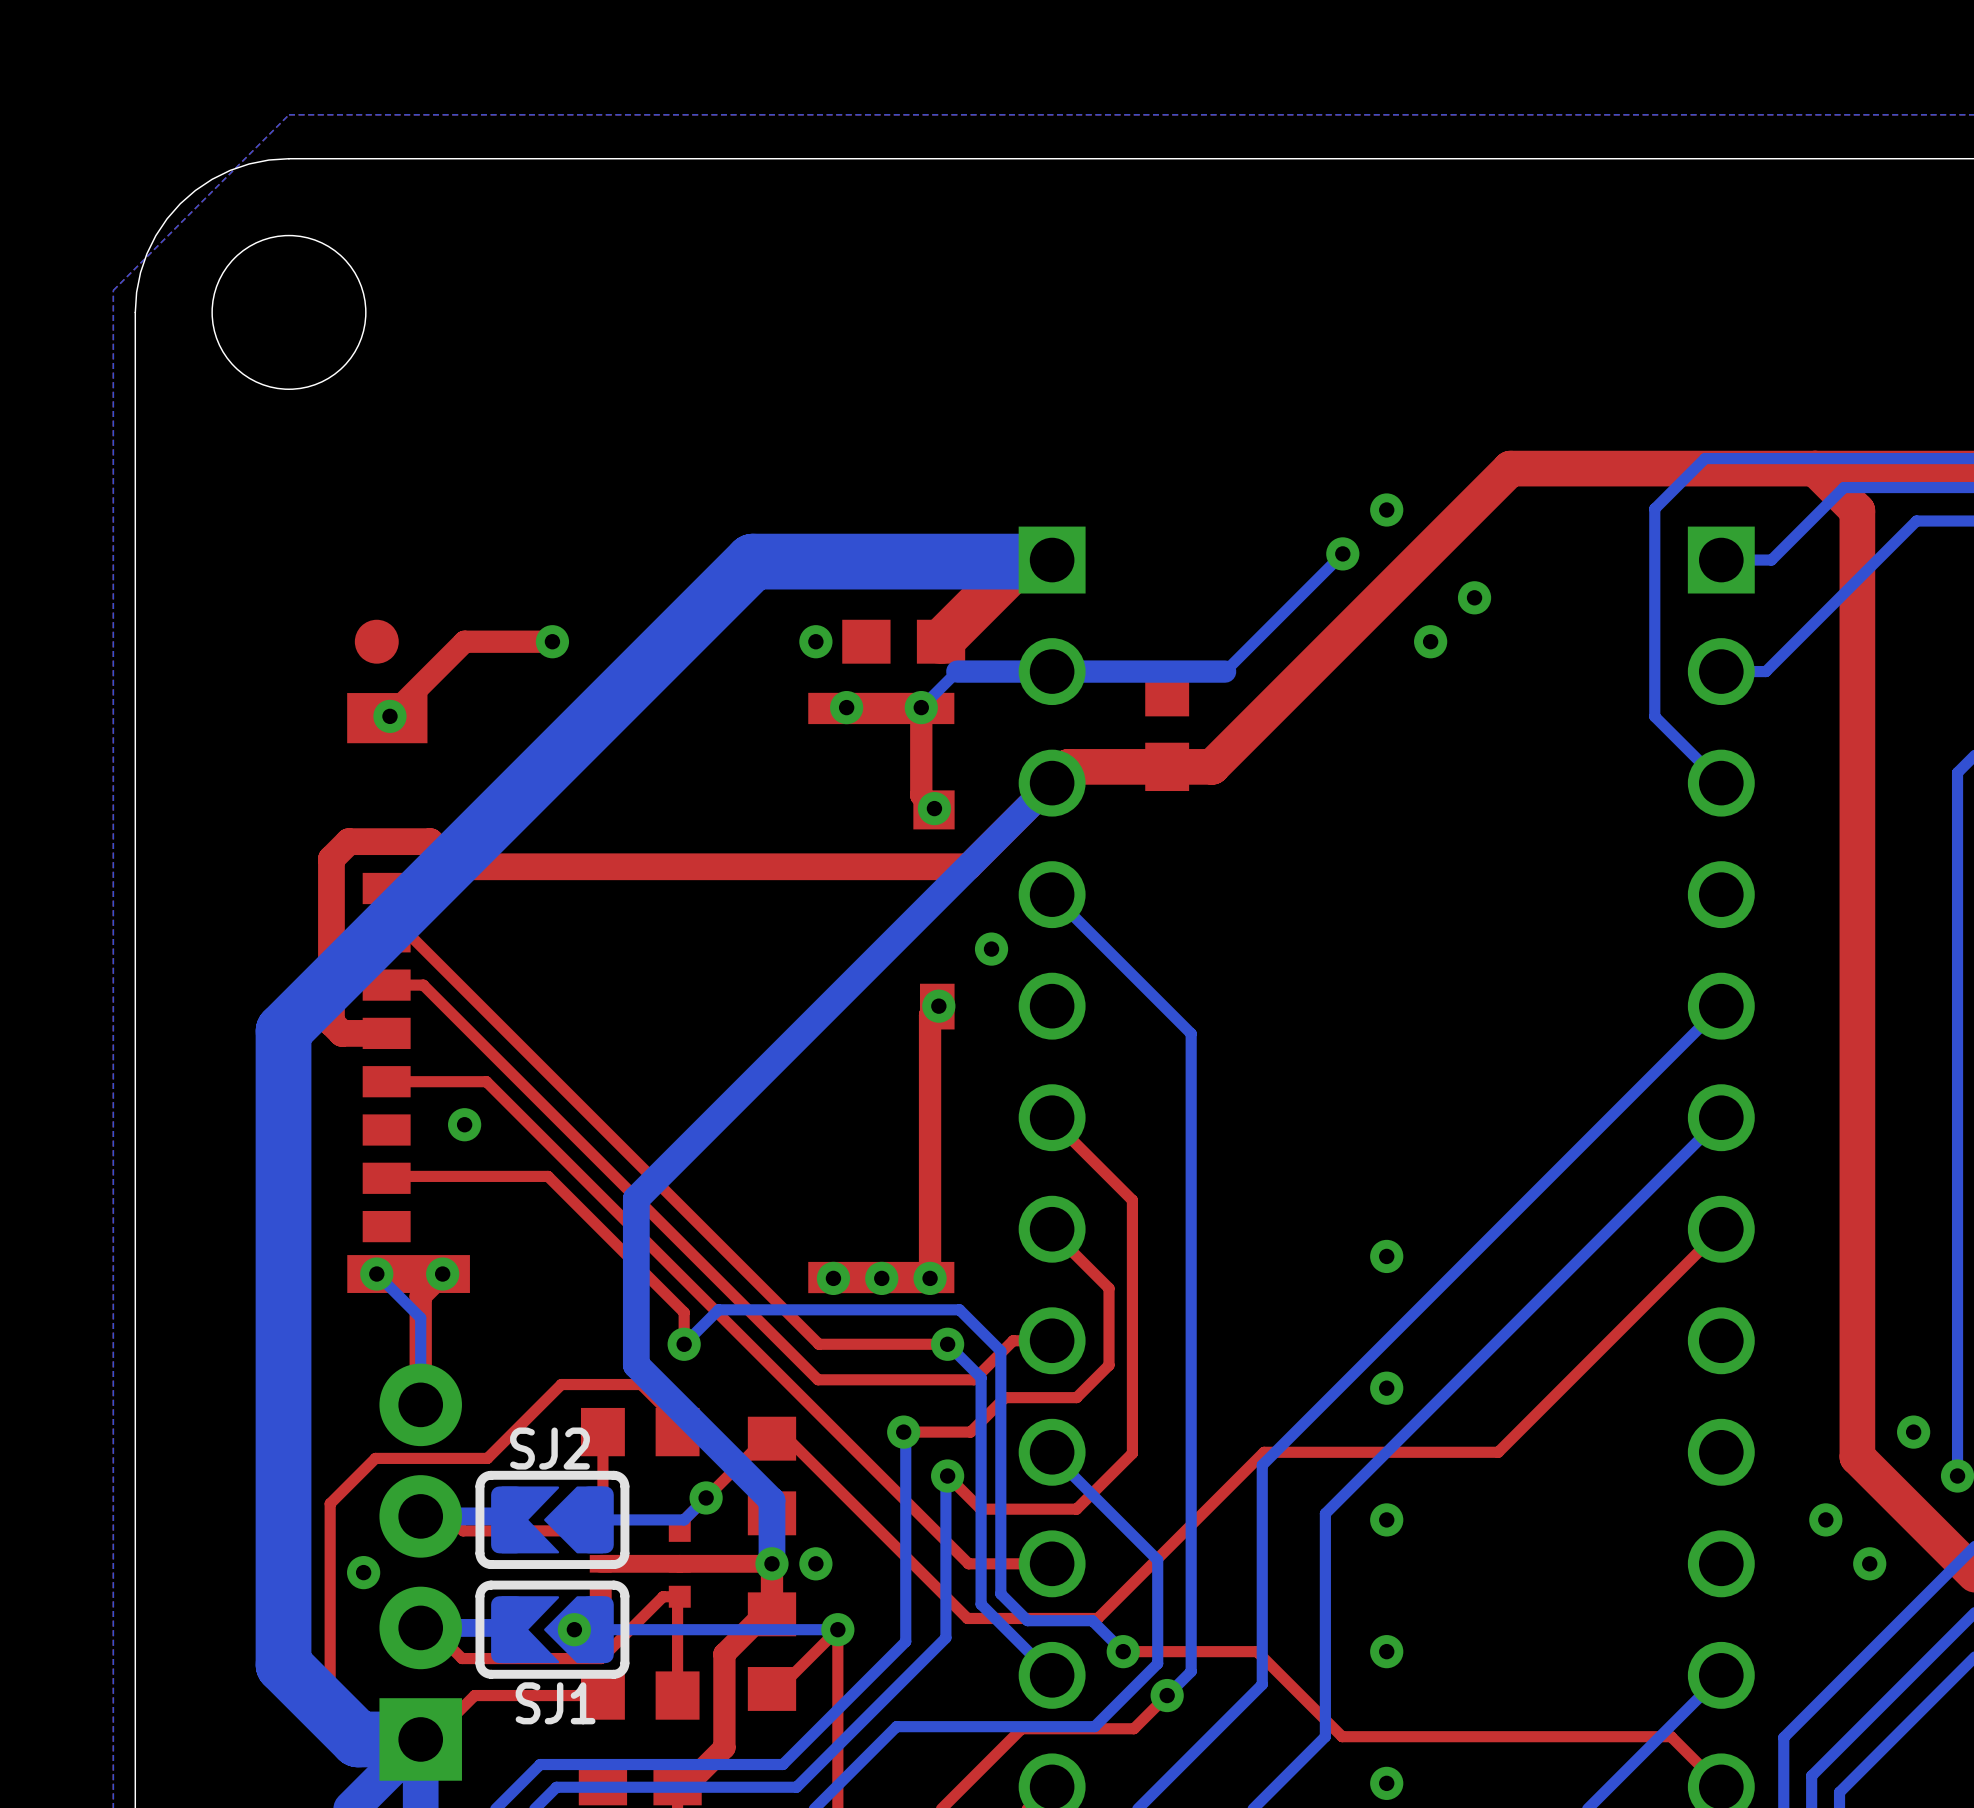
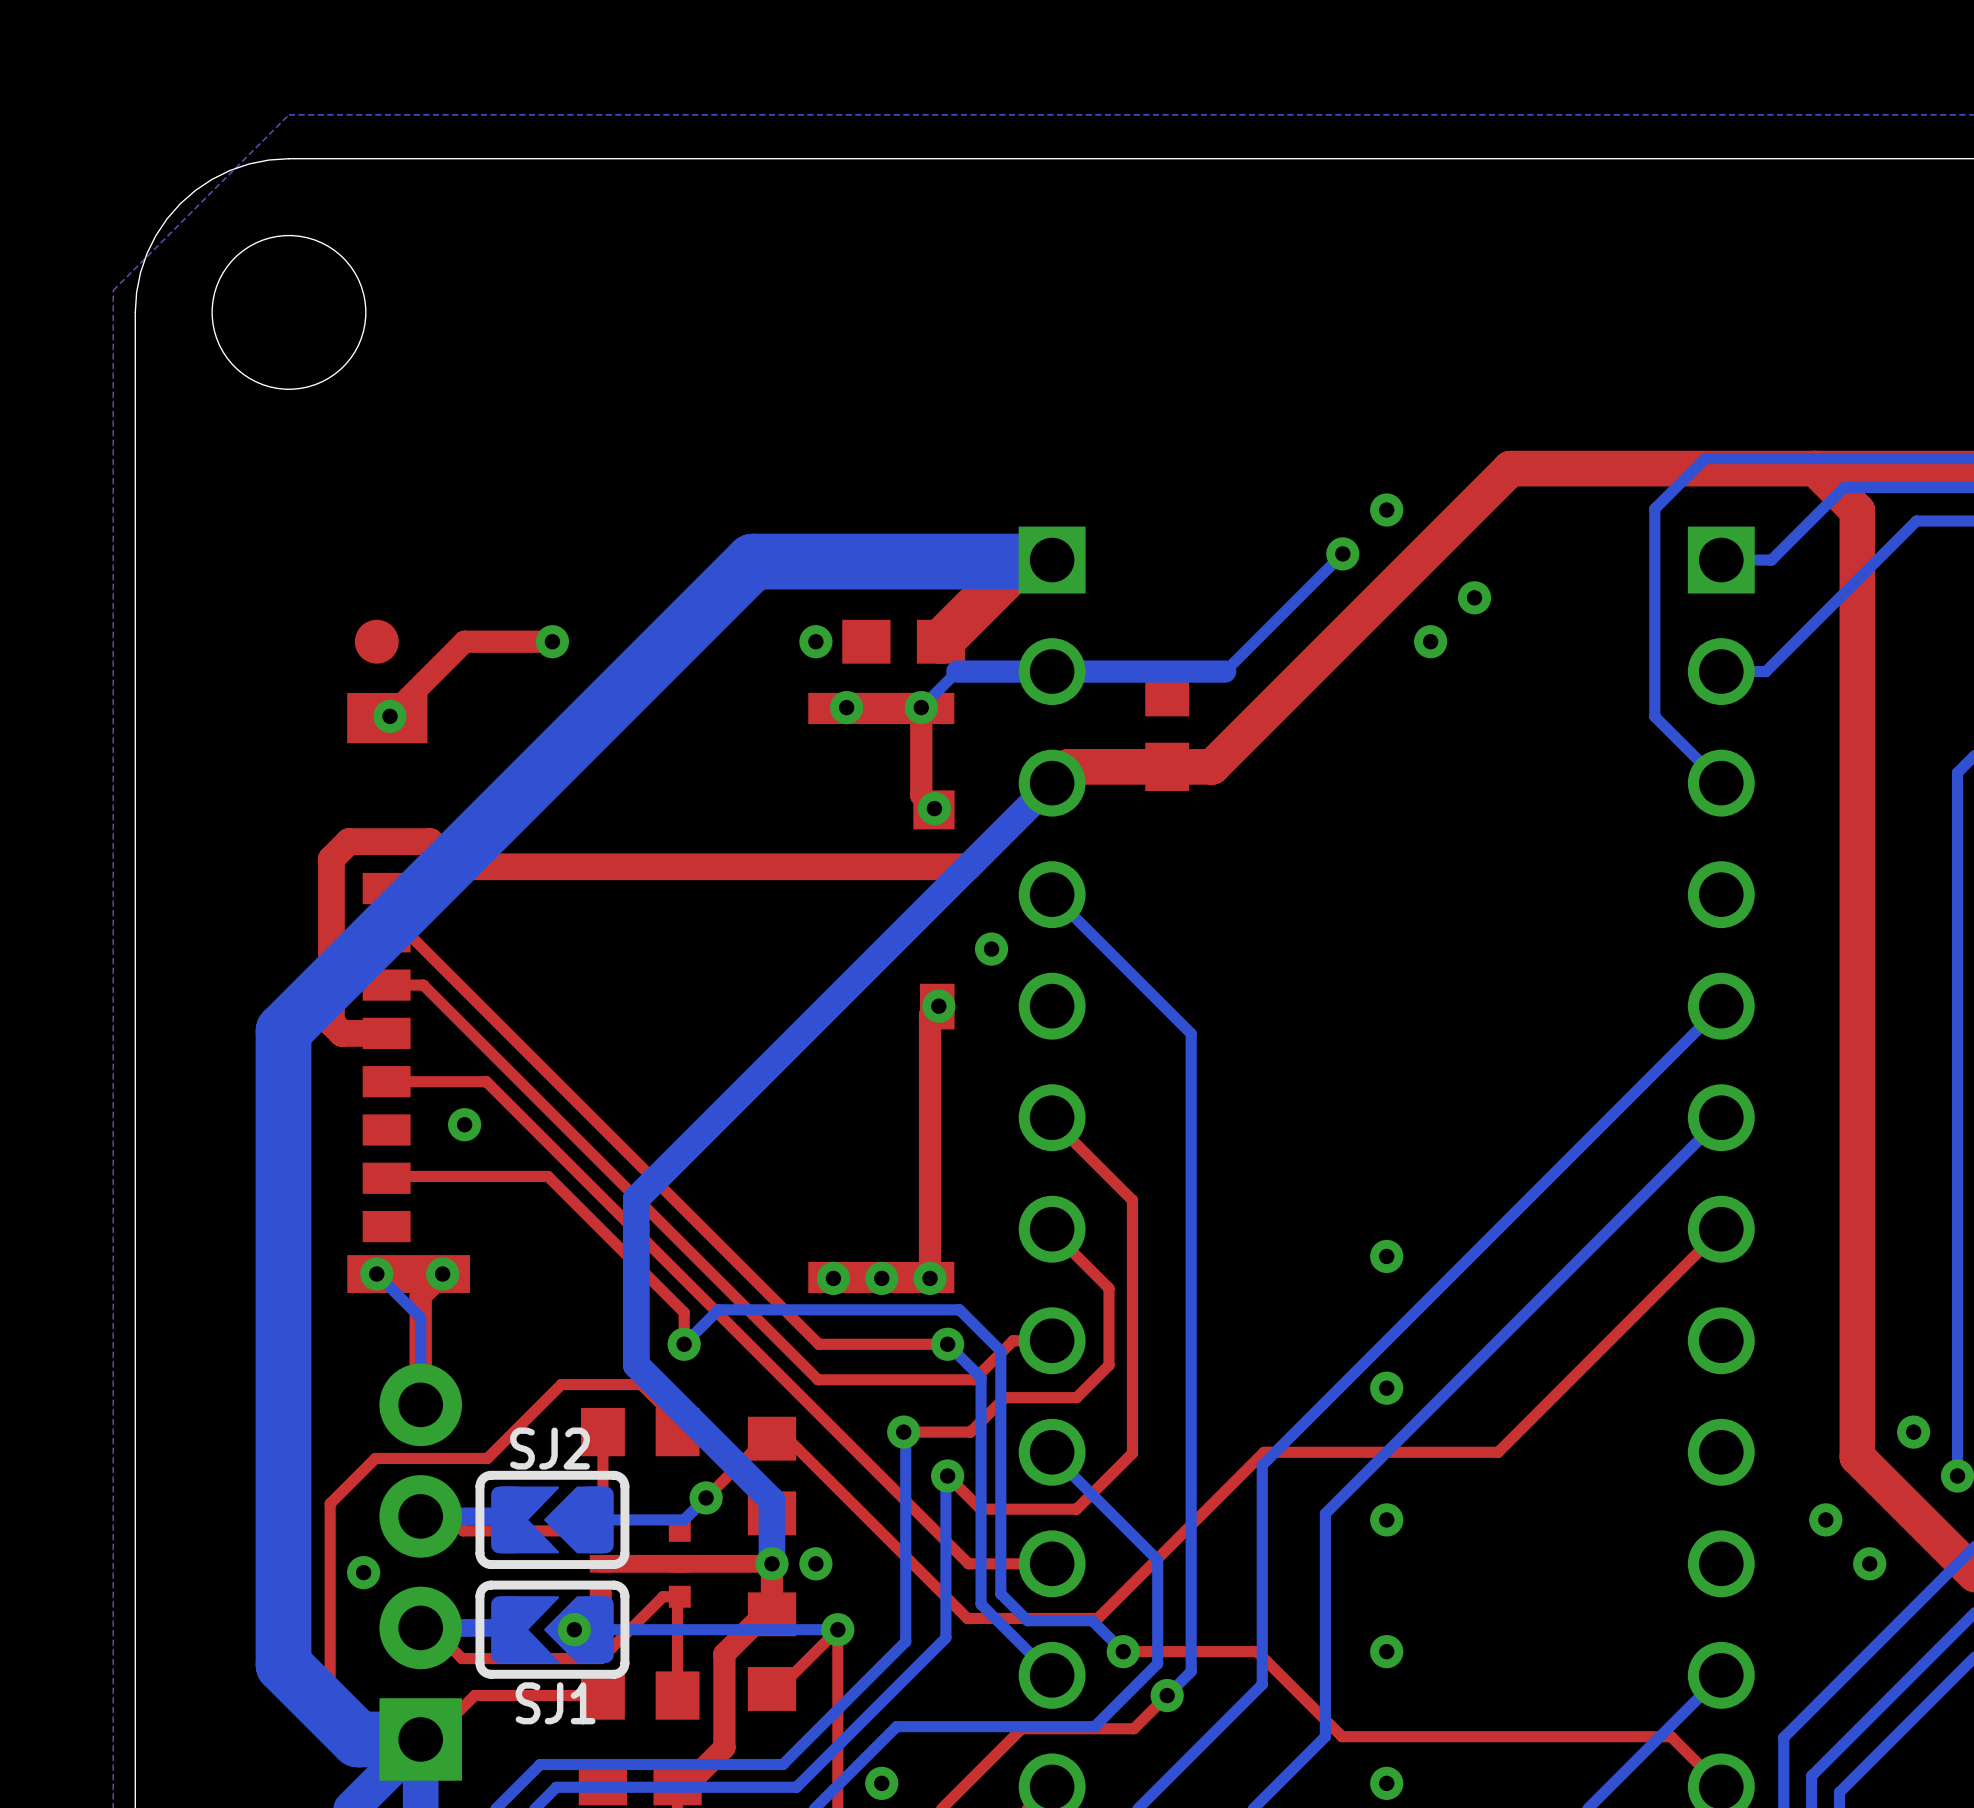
via: none -> (881, 1783)

